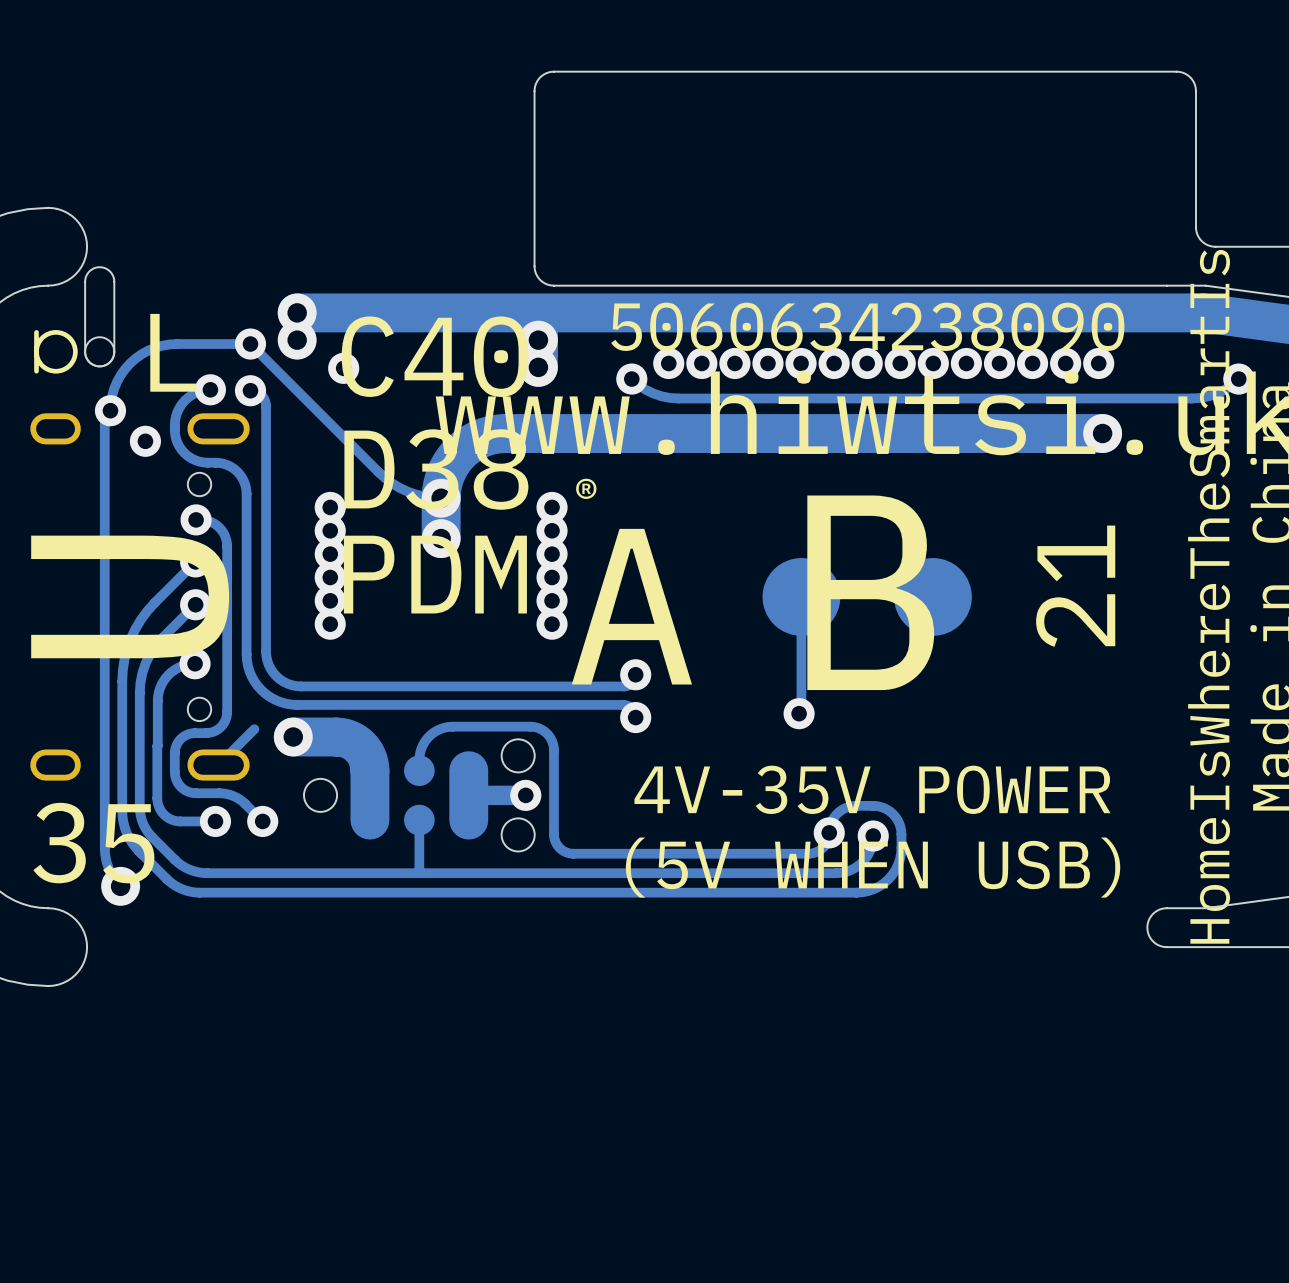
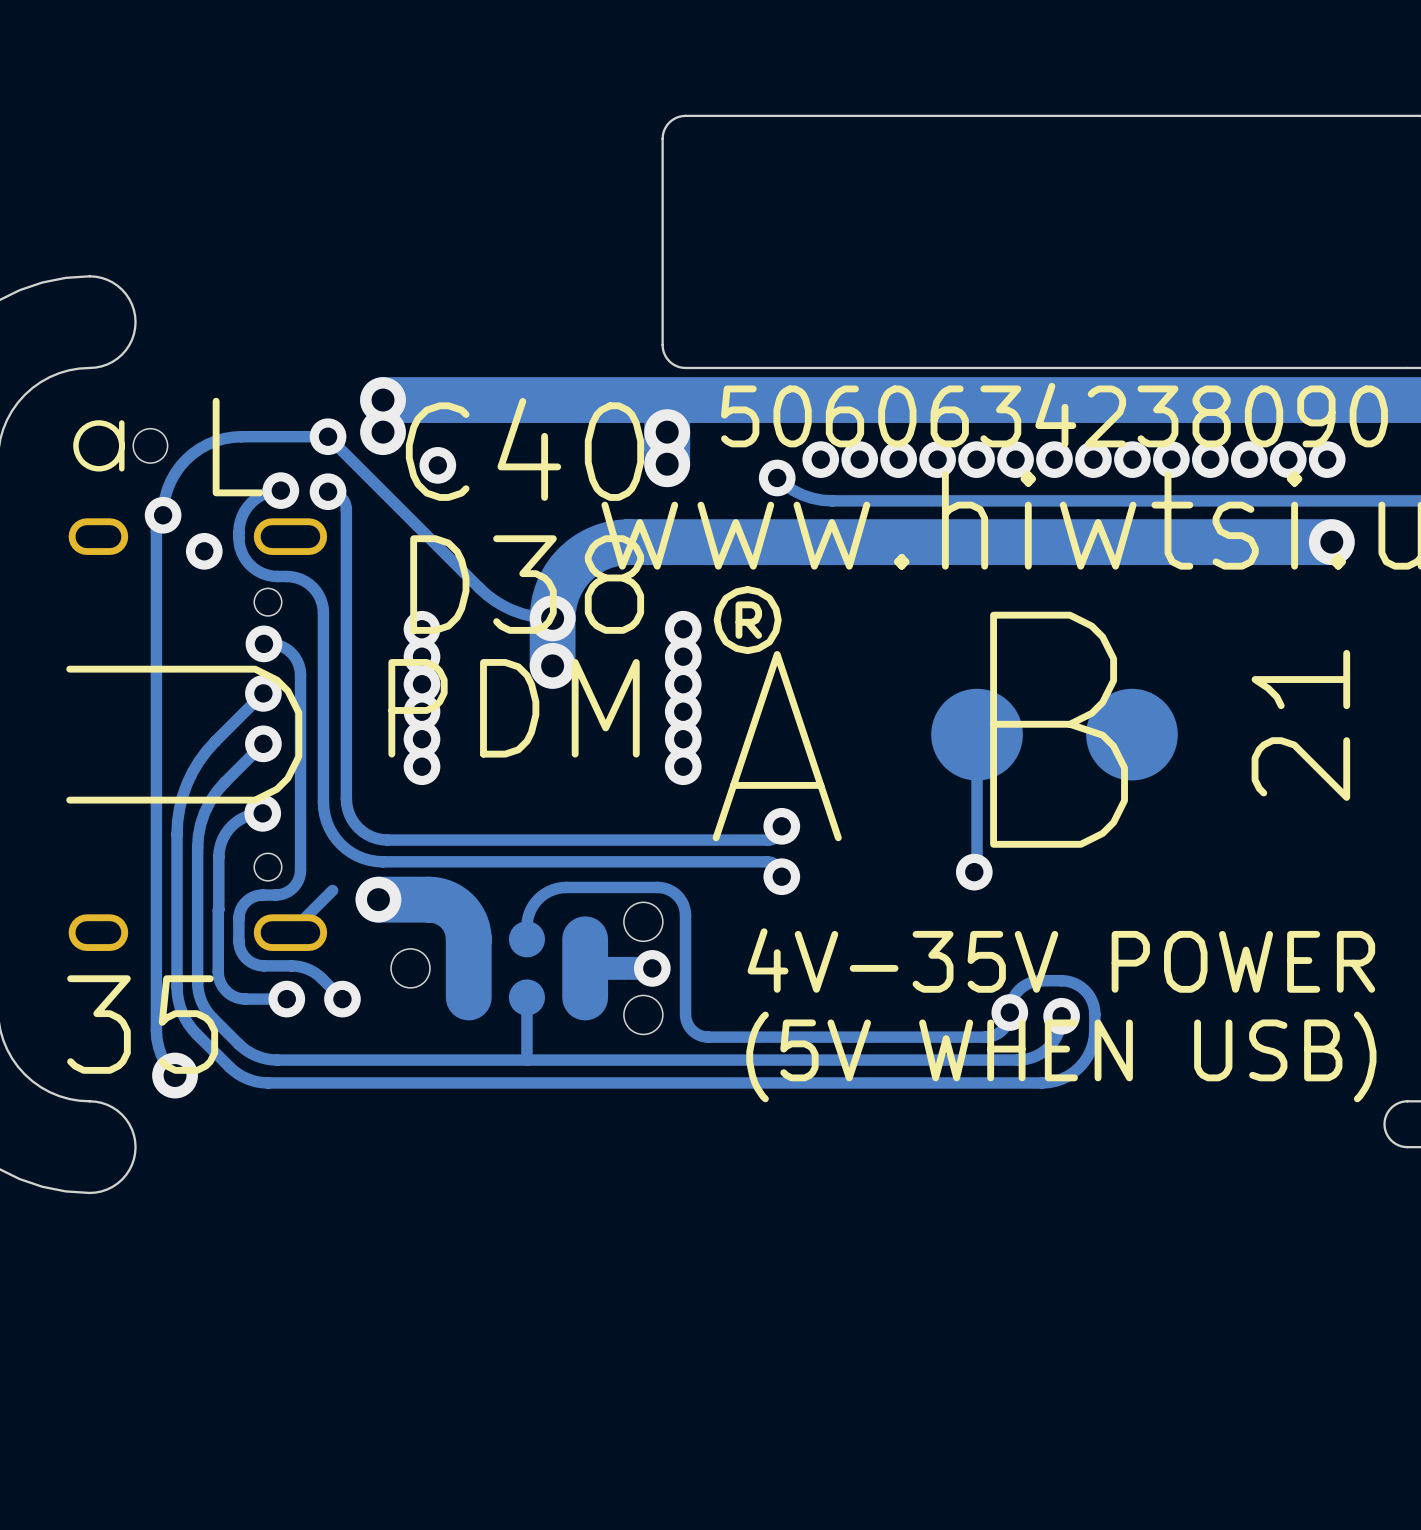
board edge: (114, 281) (113, 355) (106, 364) (96, 365) (88, 361) (85, 353) (85, 278) (92, 269) (101, 267) (111, 272) (114, 281) -> none
line: (36, 332) (36, 371) -> (121, 422) (121, 468)

